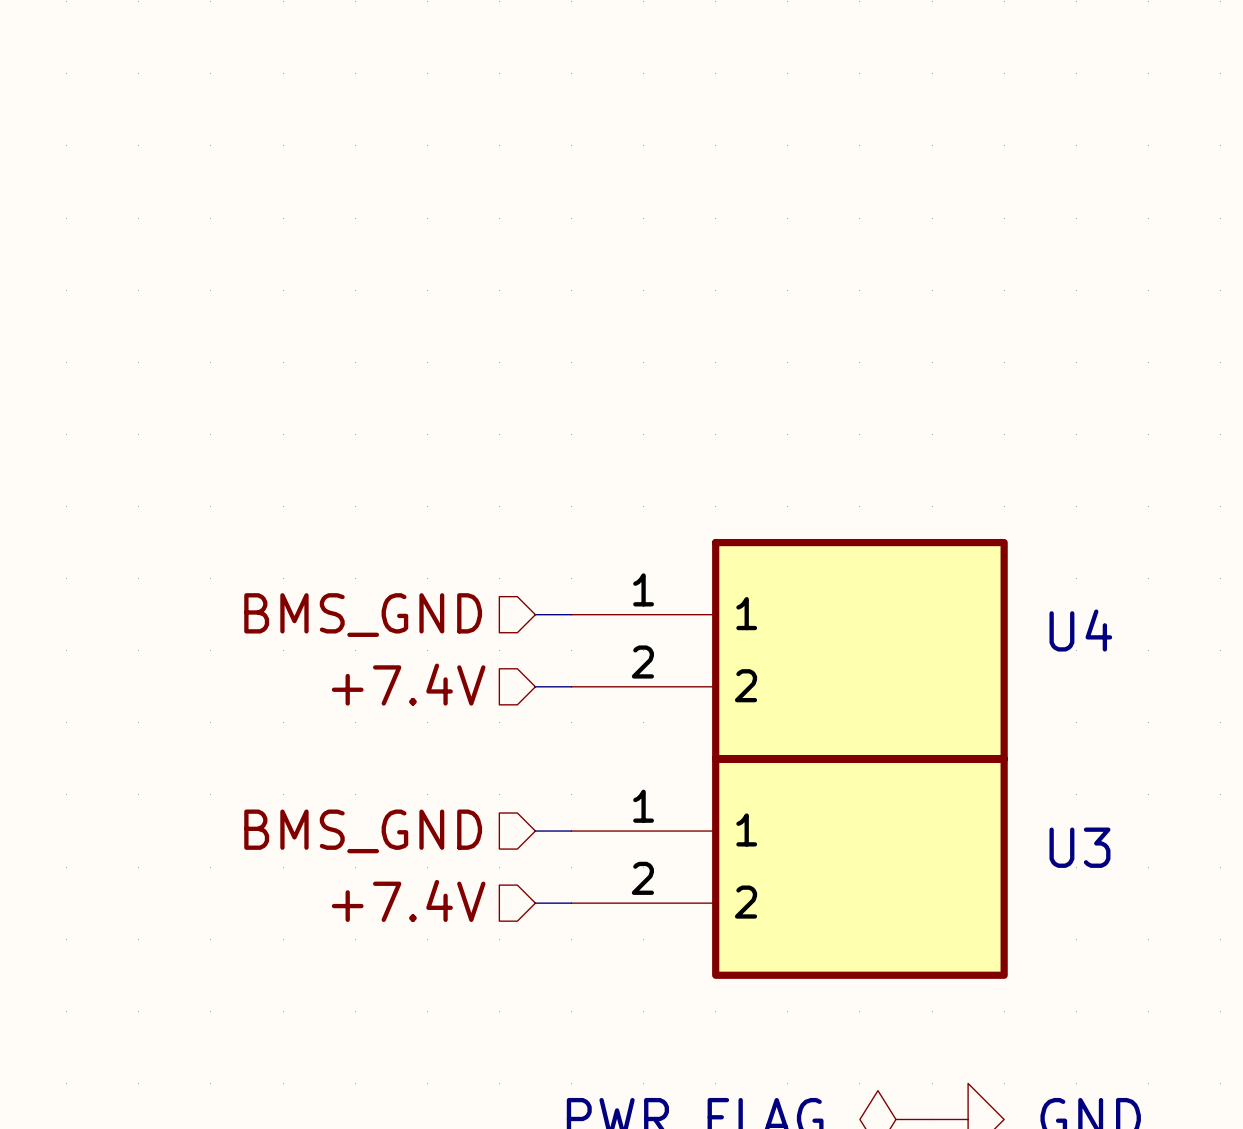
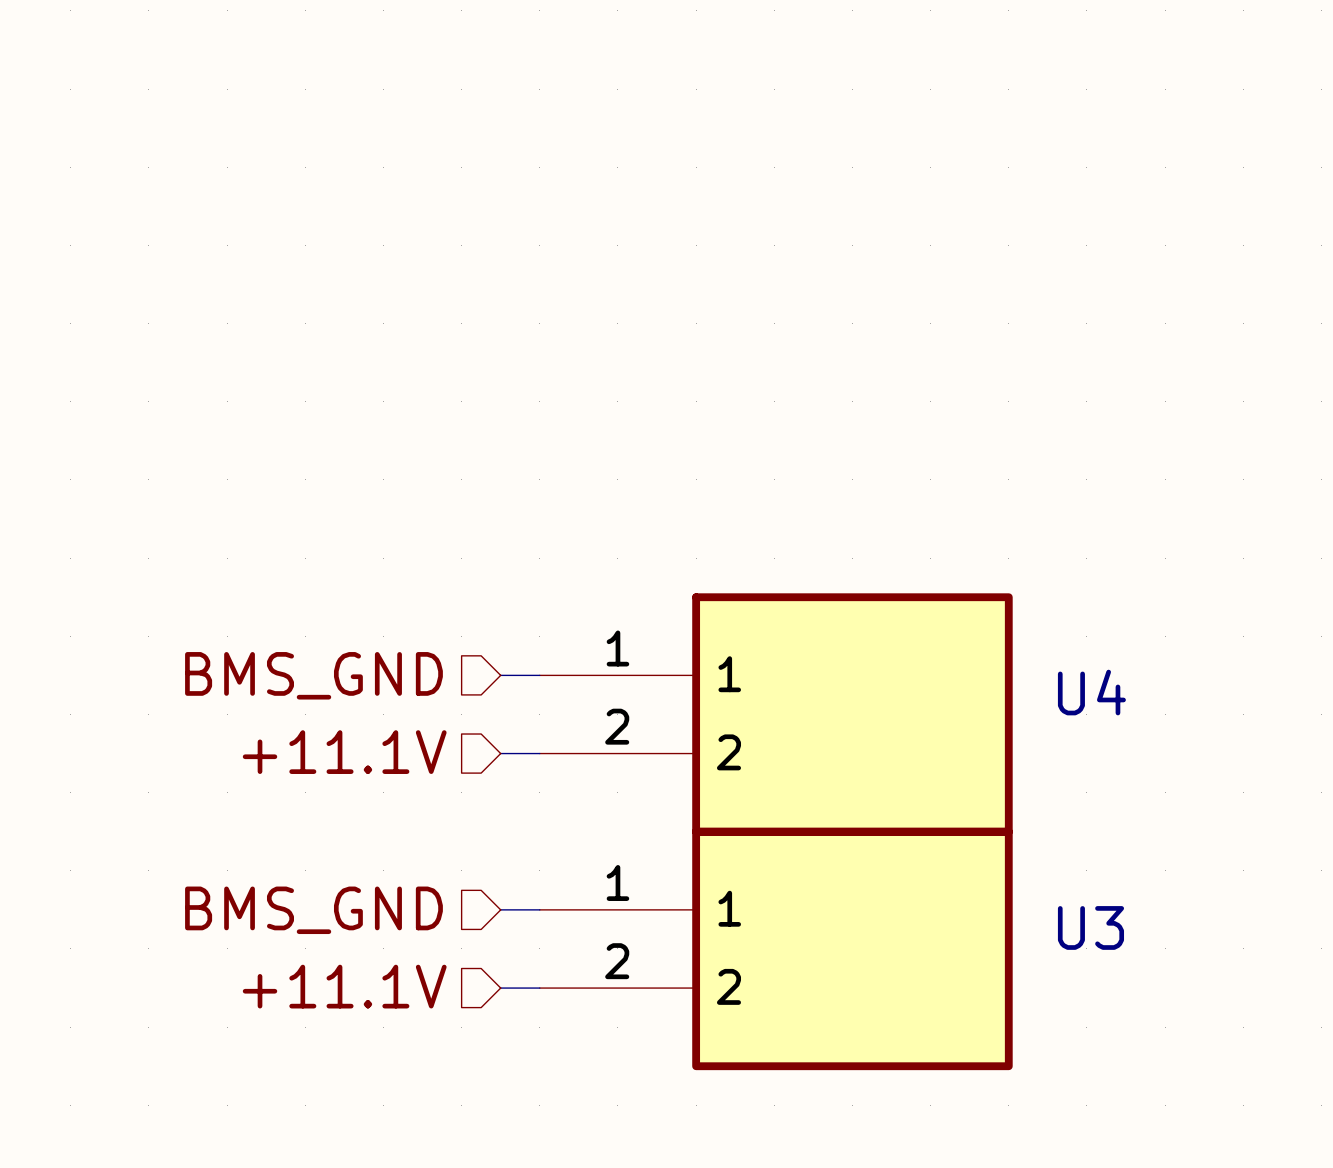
hierarchical label: +7.4V (408, 684) -> +11.1V (344, 752)
hierarchical label: +7.4V (408, 900) -> +11.1V (344, 986)

